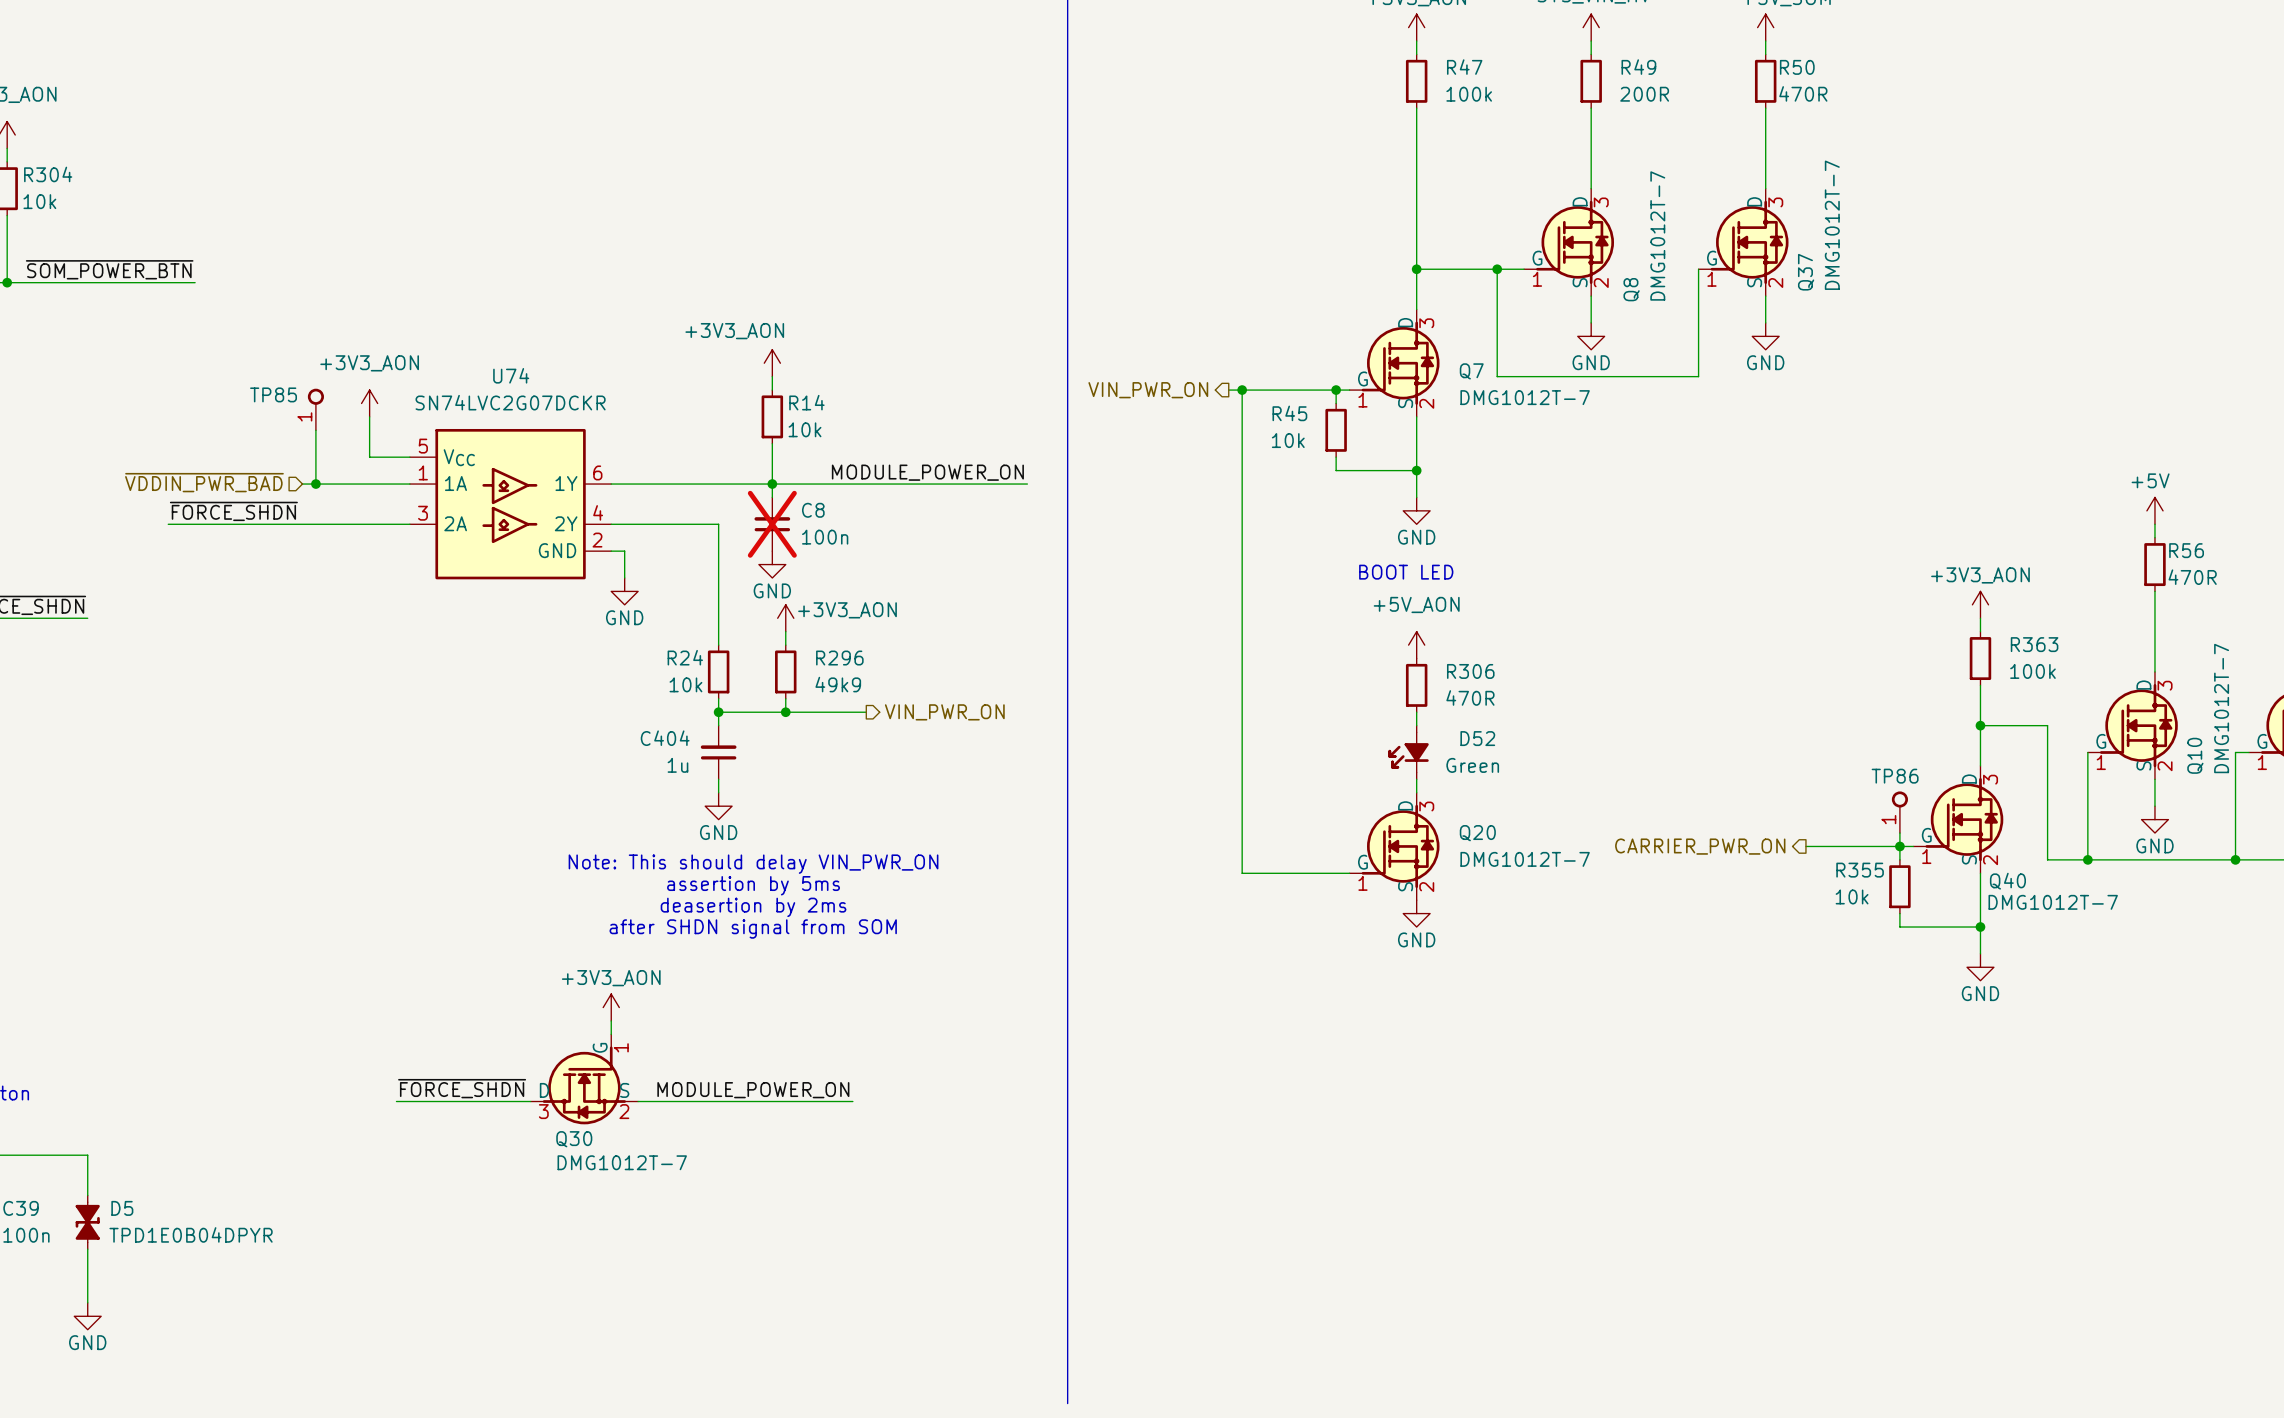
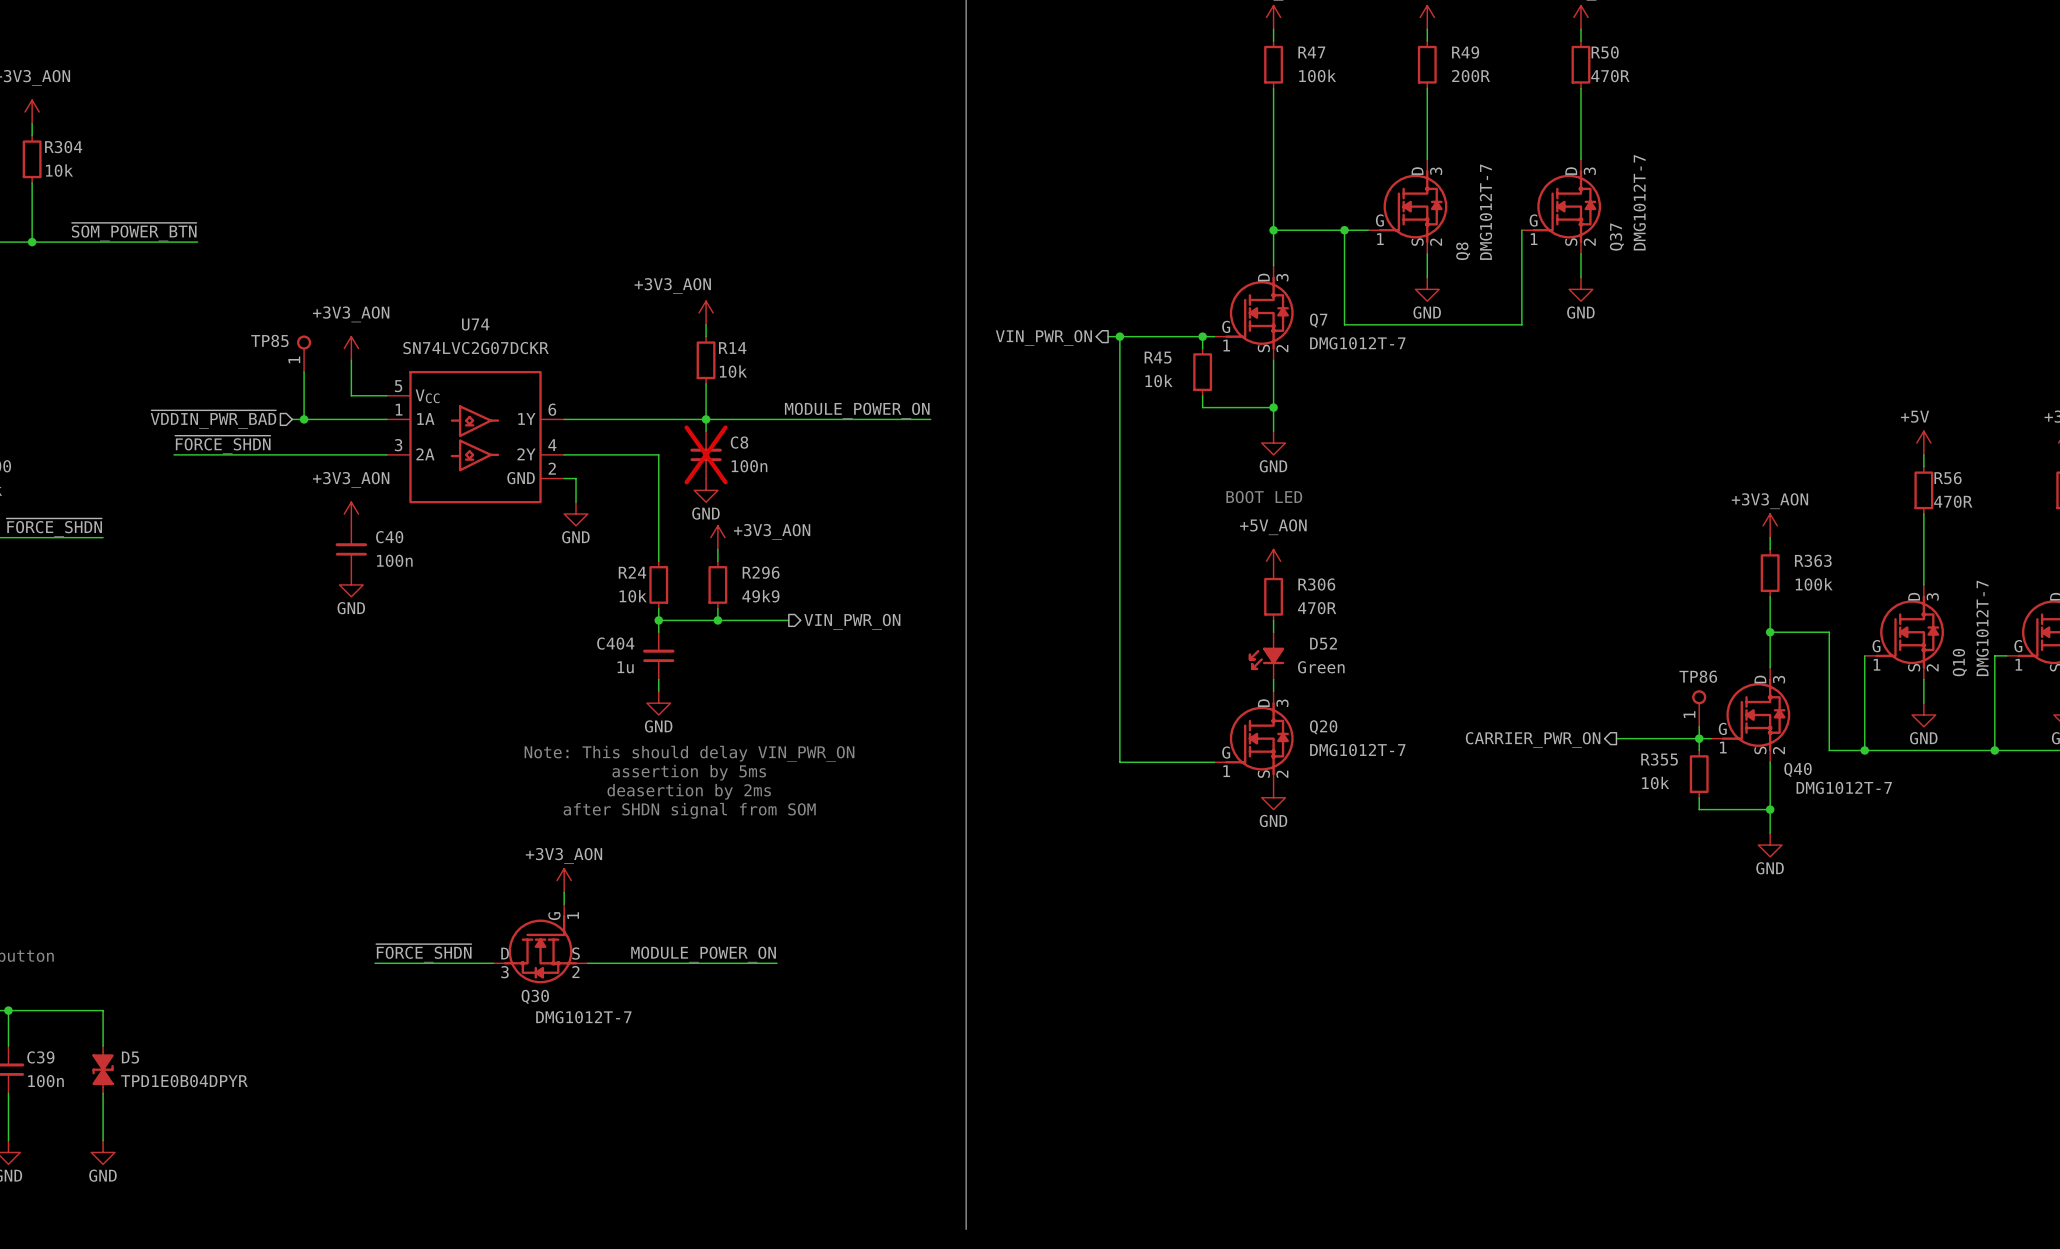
power symbol: none -> +3V3_AON (351, 514)
C40: none -> (351, 549)
power symbol: none -> GND (351, 584)

